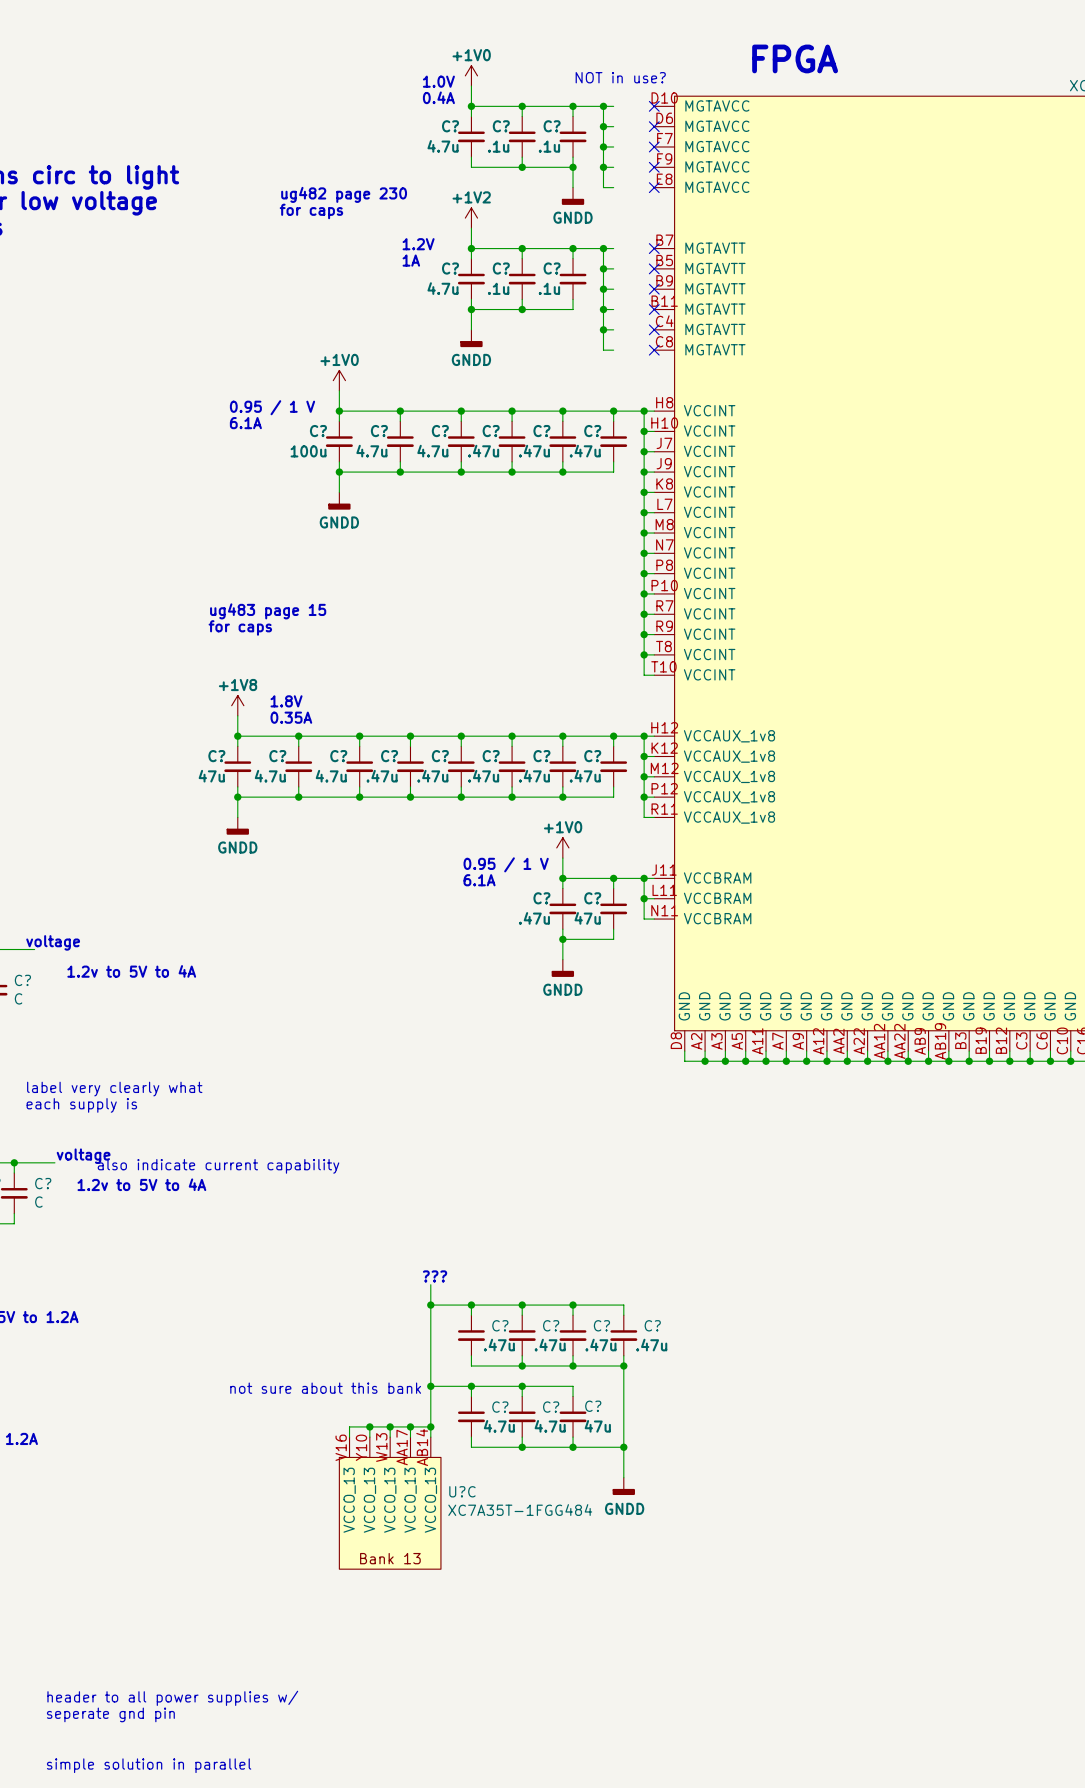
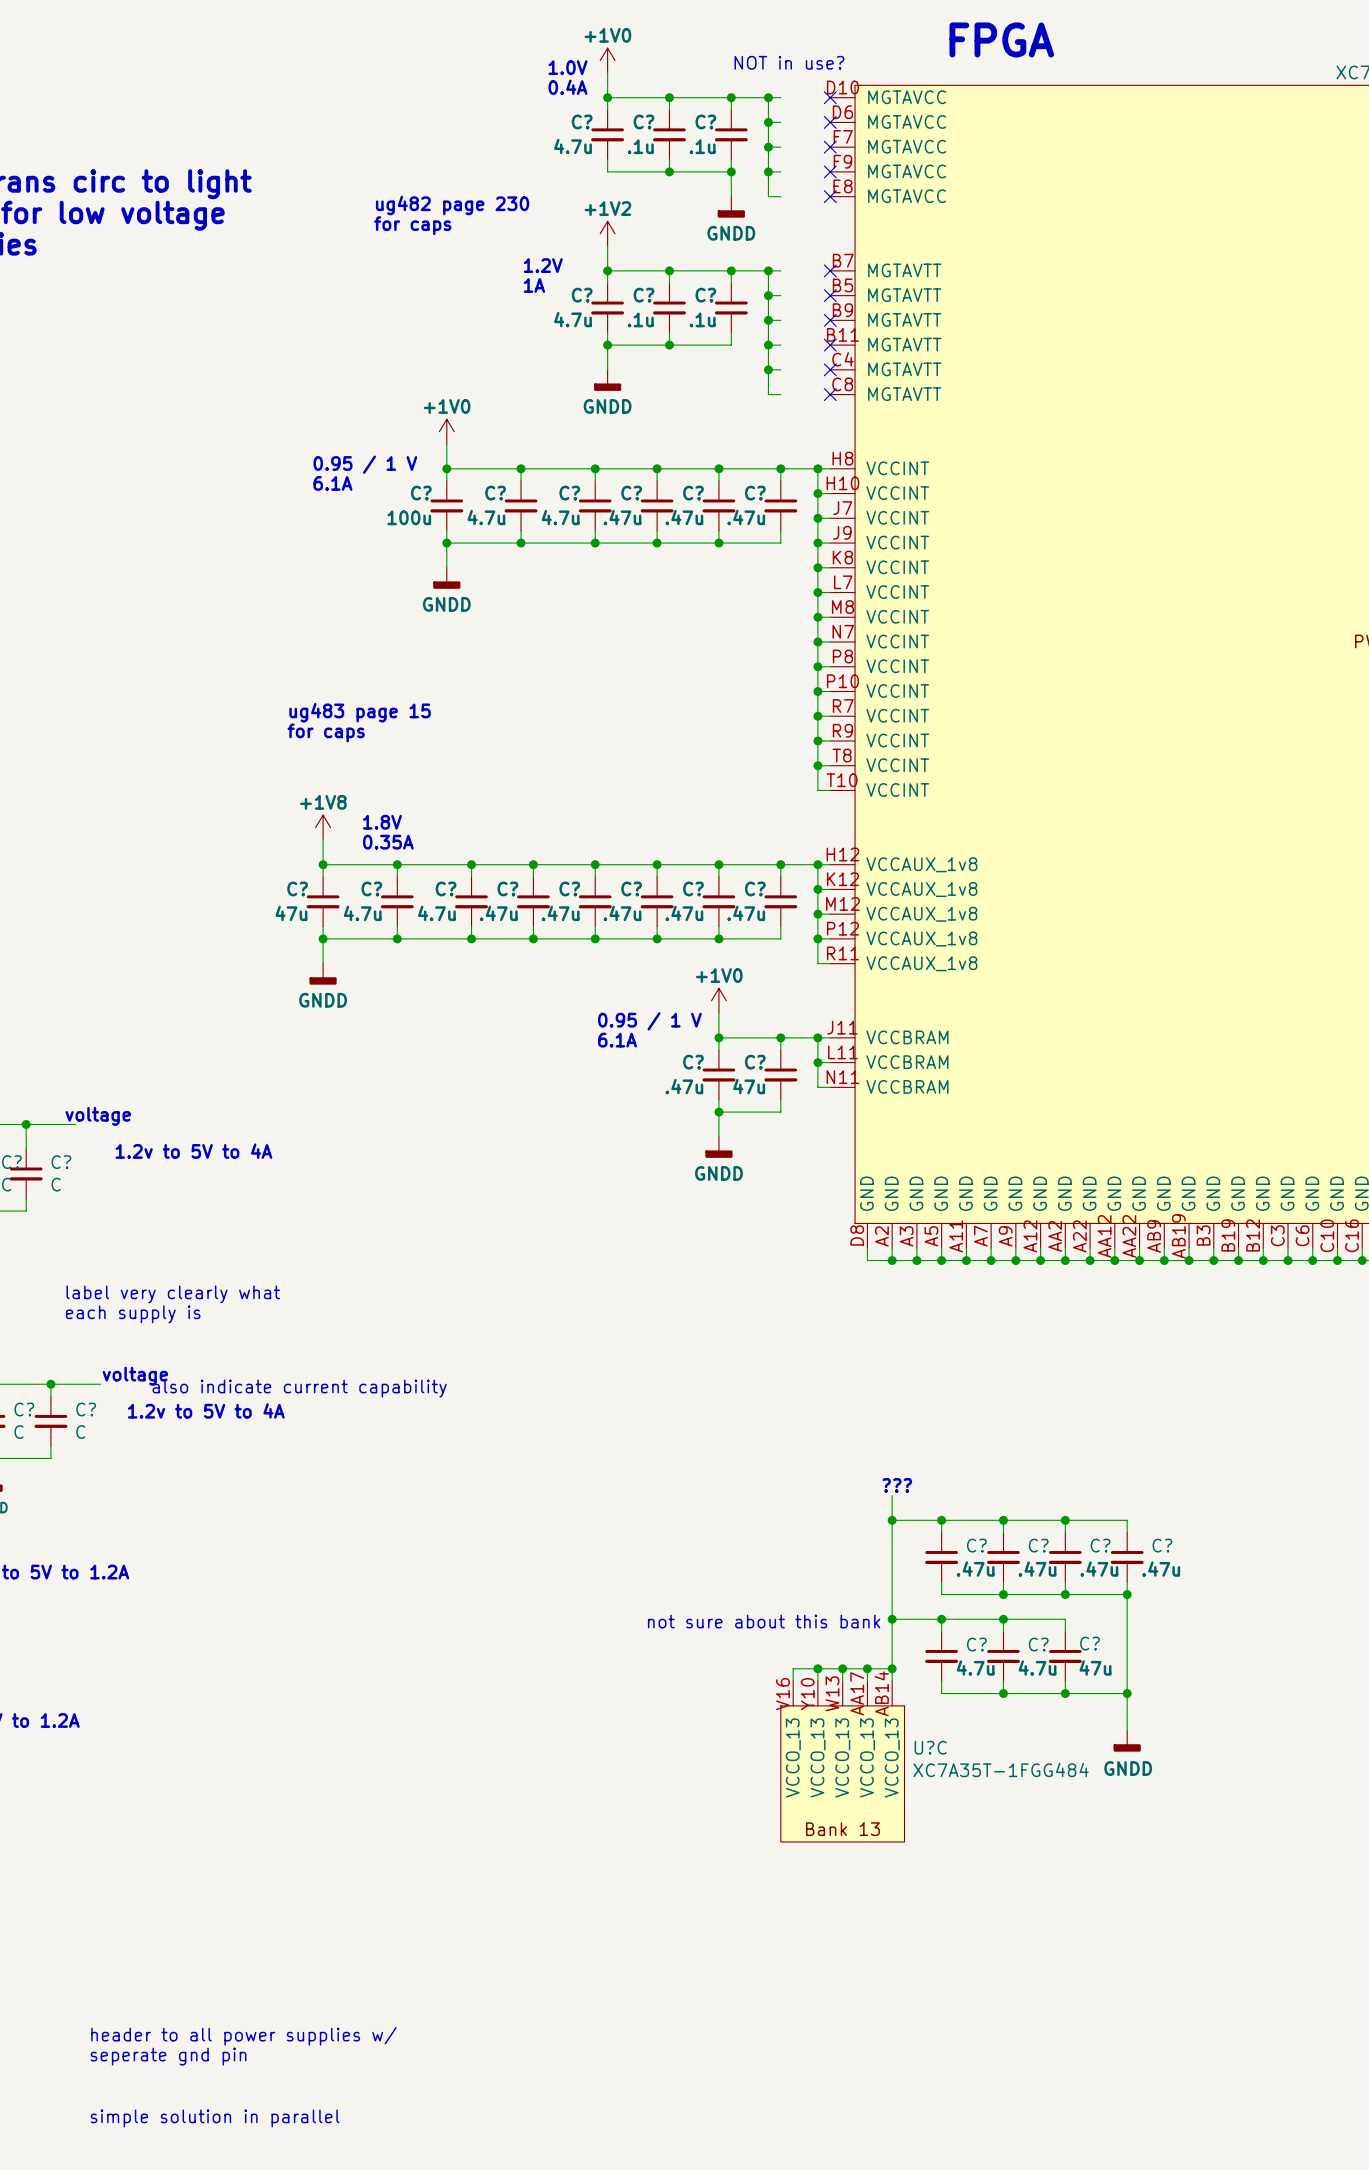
text: none -> ??? (897, 1485)
wire: none -> (892, 1495) (892, 1681)
wire: none -> (892, 1520) (1127, 1520) (1127, 1532)
junction: none -> (892, 1520)
junction: none -> (941, 1520)
wire: none -> (1003, 1520) (1003, 1532)
junction: none -> (1003, 1520)
wire: none -> (1065, 1520) (1065, 1532)
junction: none -> (1065, 1520)
text: ??? (435, 1276) -> none
wire: (430, 1284) (430, 1437) -> none
wire: (430, 1305) (623, 1305) (623, 1315) -> none
junction: (430, 1305) -> none
wire: (471, 1305) (471, 1315) -> none
junction: (471, 1305) -> none
wire: (522, 1305) (522, 1315) -> none
junction: (522, 1305) -> none
wire: (573, 1305) (573, 1315) -> (817, 1668) (817, 1681)
junction: (573, 1305) -> none
C?: none -> .47u (941, 1557)
C?: none -> .47u (1003, 1557)
C?: none -> .47u (1065, 1557)
C?: none -> .47u (1127, 1557)
wire: none -> (941, 1582) (941, 1594) (1127, 1594)
wire: none -> (1003, 1582) (1003, 1594)
wire: none -> (1065, 1582) (1065, 1594)
wire: none -> (1127, 1582) (1127, 1730)
C?: .47u (471, 1335) -> none
C?: .47u (522, 1335) -> none
C?: .47u (573, 1335) -> none
C?: .47u (623, 1335) -> none
junction: none -> (1003, 1594)
junction: none -> (1065, 1594)
junction: none -> (1127, 1594)
wire: (471, 1355) (471, 1366) (623, 1366) -> none
wire: (522, 1355) (522, 1366) -> (867, 1668) (867, 1681)
wire: (573, 1355) (573, 1366) -> (941, 1520) (941, 1532)
wire: (623, 1355) (623, 1396) -> (892, 1668) (793, 1668)
wire: none -> (892, 1619) (1065, 1619) (1065, 1631)
junction: none -> (892, 1619)
junction: none -> (941, 1619)
wire: none -> (1003, 1619) (1003, 1631)
junction: none -> (1003, 1619)
text: none -> not sure about this bank (764, 1621)
junction: (522, 1366) -> none
junction: (573, 1366) -> none
junction: (623, 1366) -> none
wire: (430, 1386) (573, 1386) (573, 1396) -> none
junction: (430, 1386) -> none
wire: (471, 1386) (471, 1396) -> none
junction: (471, 1386) -> none
wire: (522, 1386) (522, 1396) -> (842, 1668) (842, 1681)
junction: (522, 1386) -> none
C?: none -> 4.7u (941, 1656)
C?: none -> 4.7u (1003, 1656)
C?: none -> 47u (1065, 1656)
text: not sure about this bank (325, 1388) -> none
junction: none -> (817, 1668)
junction: none -> (842, 1668)
junction: none -> (867, 1668)
junction: none -> (892, 1668)
wire: none -> (941, 1681) (941, 1693) (1127, 1693)
wire: none -> (1003, 1681) (1003, 1693)
wire: none -> (1065, 1681) (1065, 1693)
C?: 4.7u (471, 1416) -> none
C?: 4.7u (522, 1416) -> none
C?: 47u (573, 1416) -> none
junction: none -> (1003, 1693)
junction: none -> (1065, 1693)
junction: none -> (1127, 1693)
wire: (369, 1426) (369, 1437) -> none
junction: (369, 1426) -> none
wire: (390, 1426) (390, 1437) -> none
junction: (390, 1426) -> none
wire: (410, 1426) (410, 1437) -> none
junction: (410, 1426) -> none
wire: (430, 1426) (349, 1426) (349, 1437) -> none
junction: (430, 1426) -> none
wire: (471, 1437) (471, 1447) (623, 1447) -> none
wire: (522, 1437) (522, 1447) -> none
wire: (573, 1437) (573, 1447) -> (941, 1619) (941, 1631)
junction: (522, 1447) -> none
junction: (573, 1447) -> none
junction: (623, 1447) -> none
power symbol: none -> GNDD (1127, 1741)
U?C: none -> XC7A35T-1FGG484 (842, 1761)
power symbol: GNDD (623, 1486) -> none
U?C: XC7A35T-1FGG484 (390, 1503) -> none

